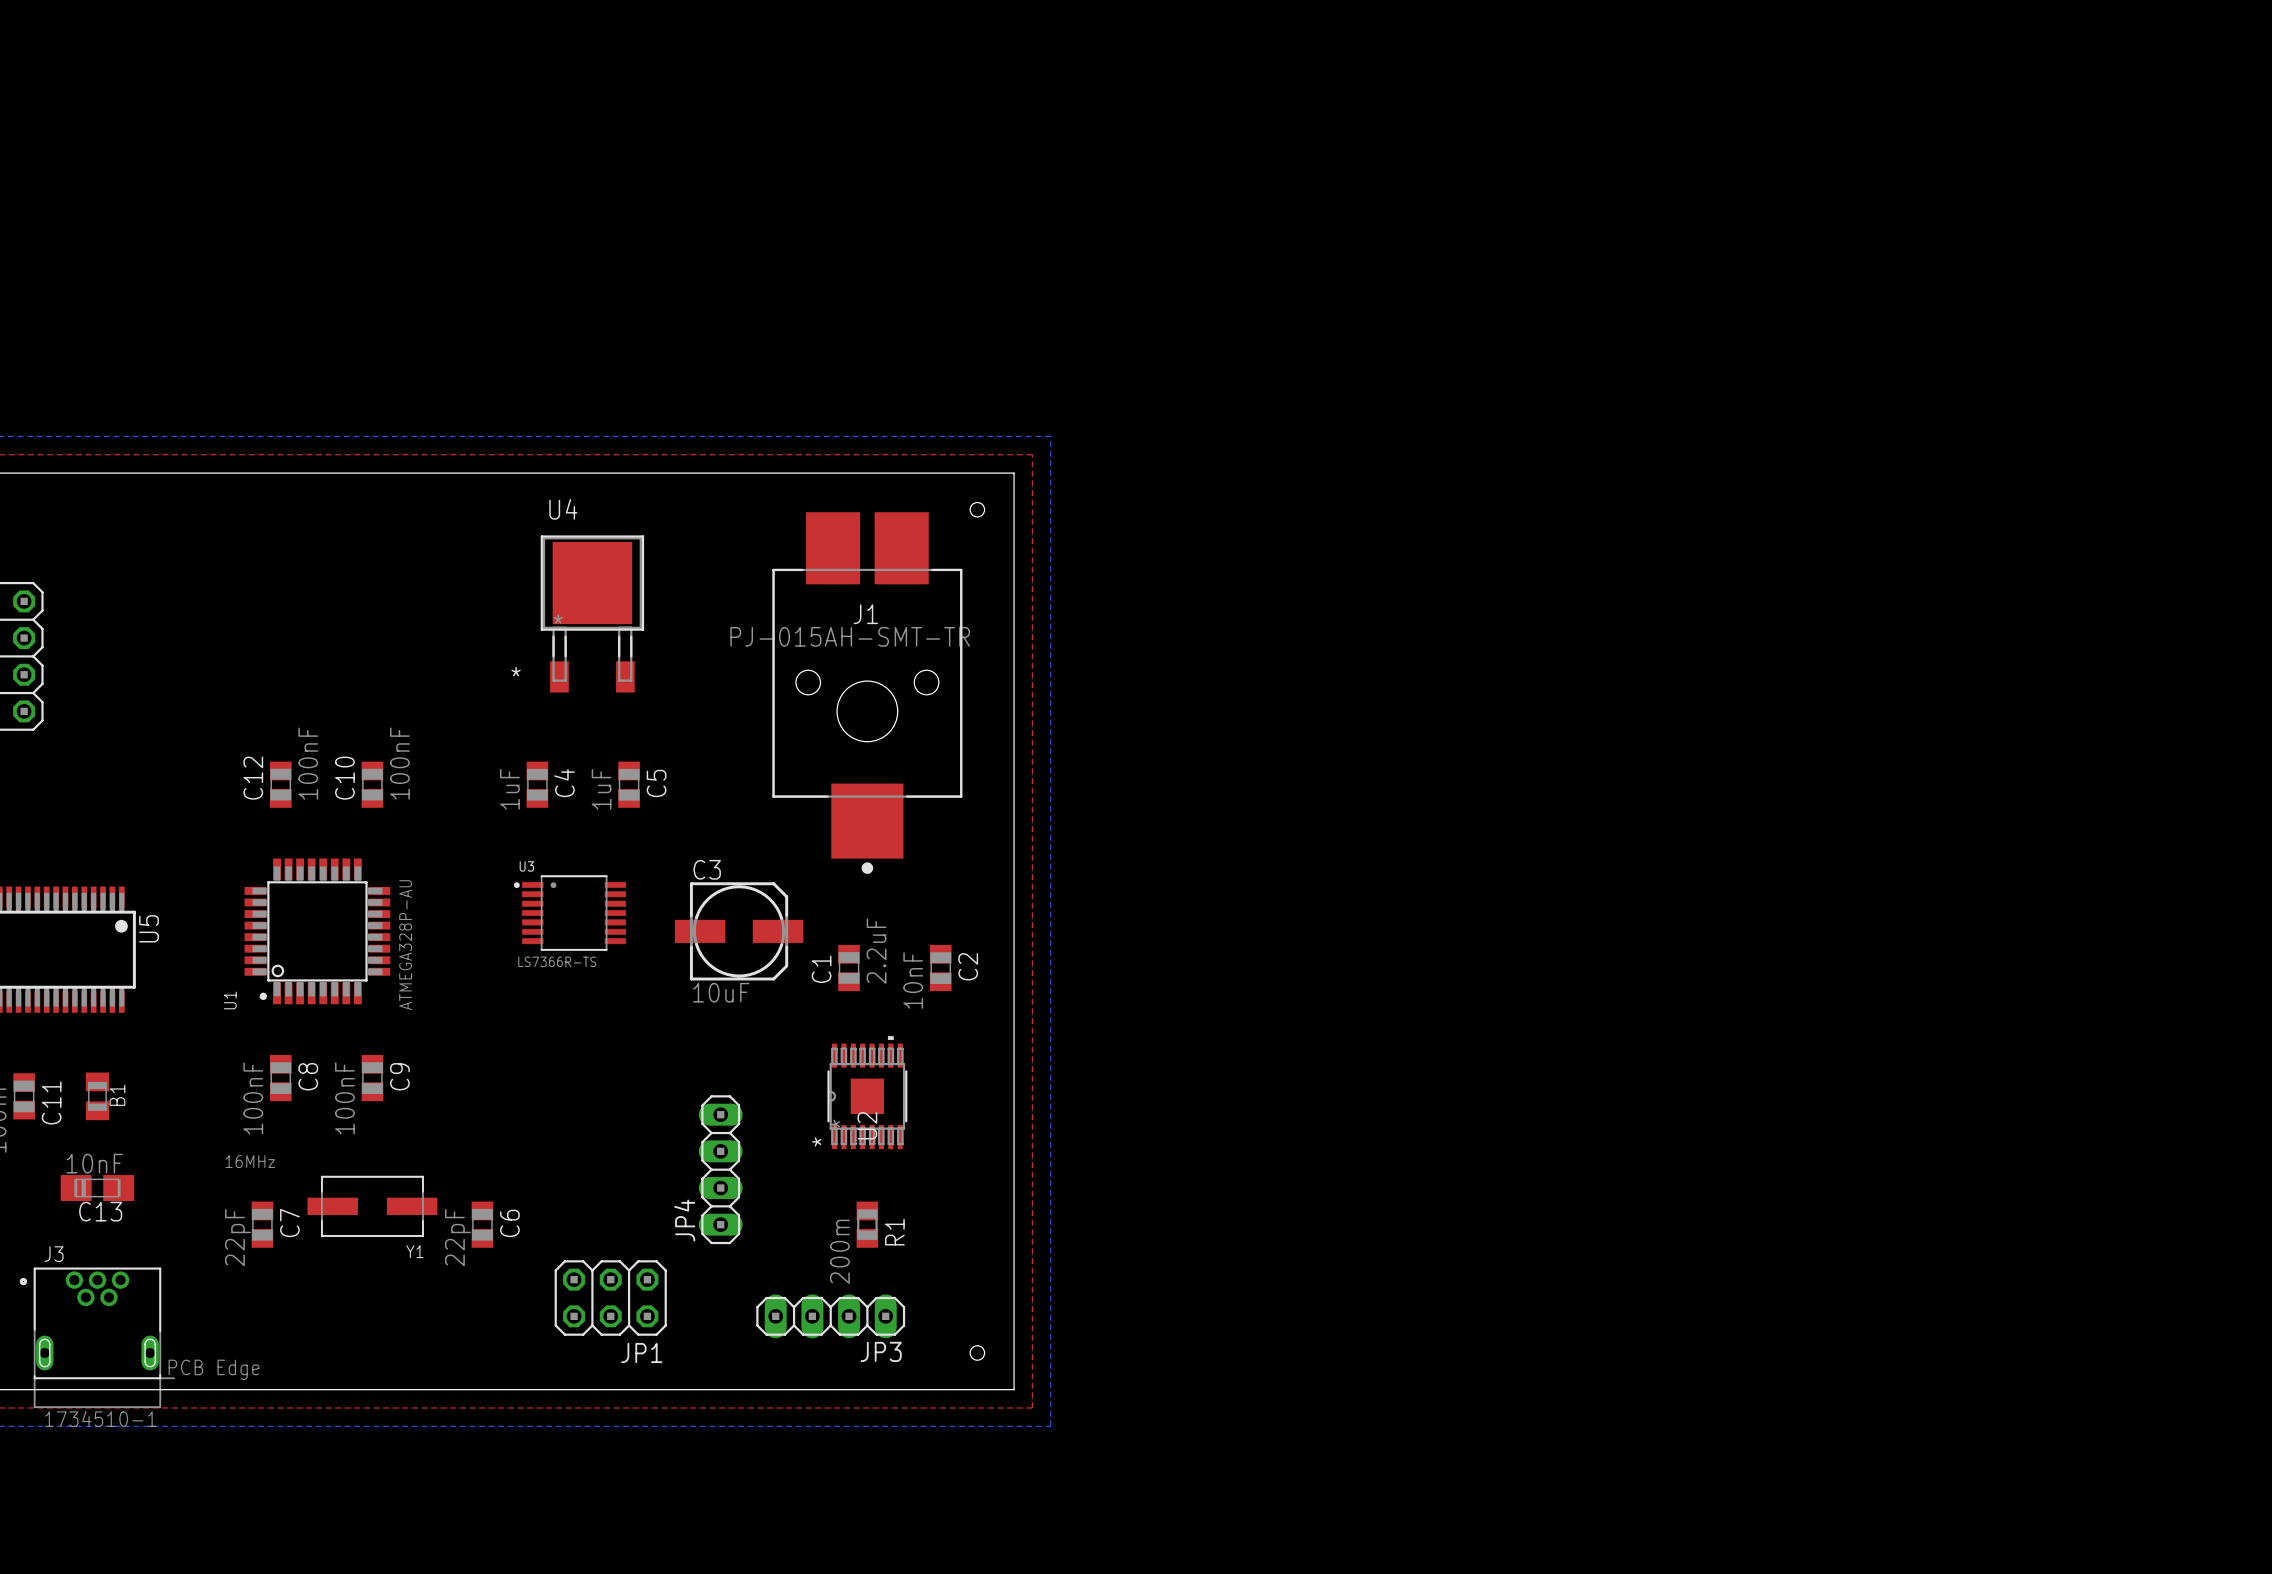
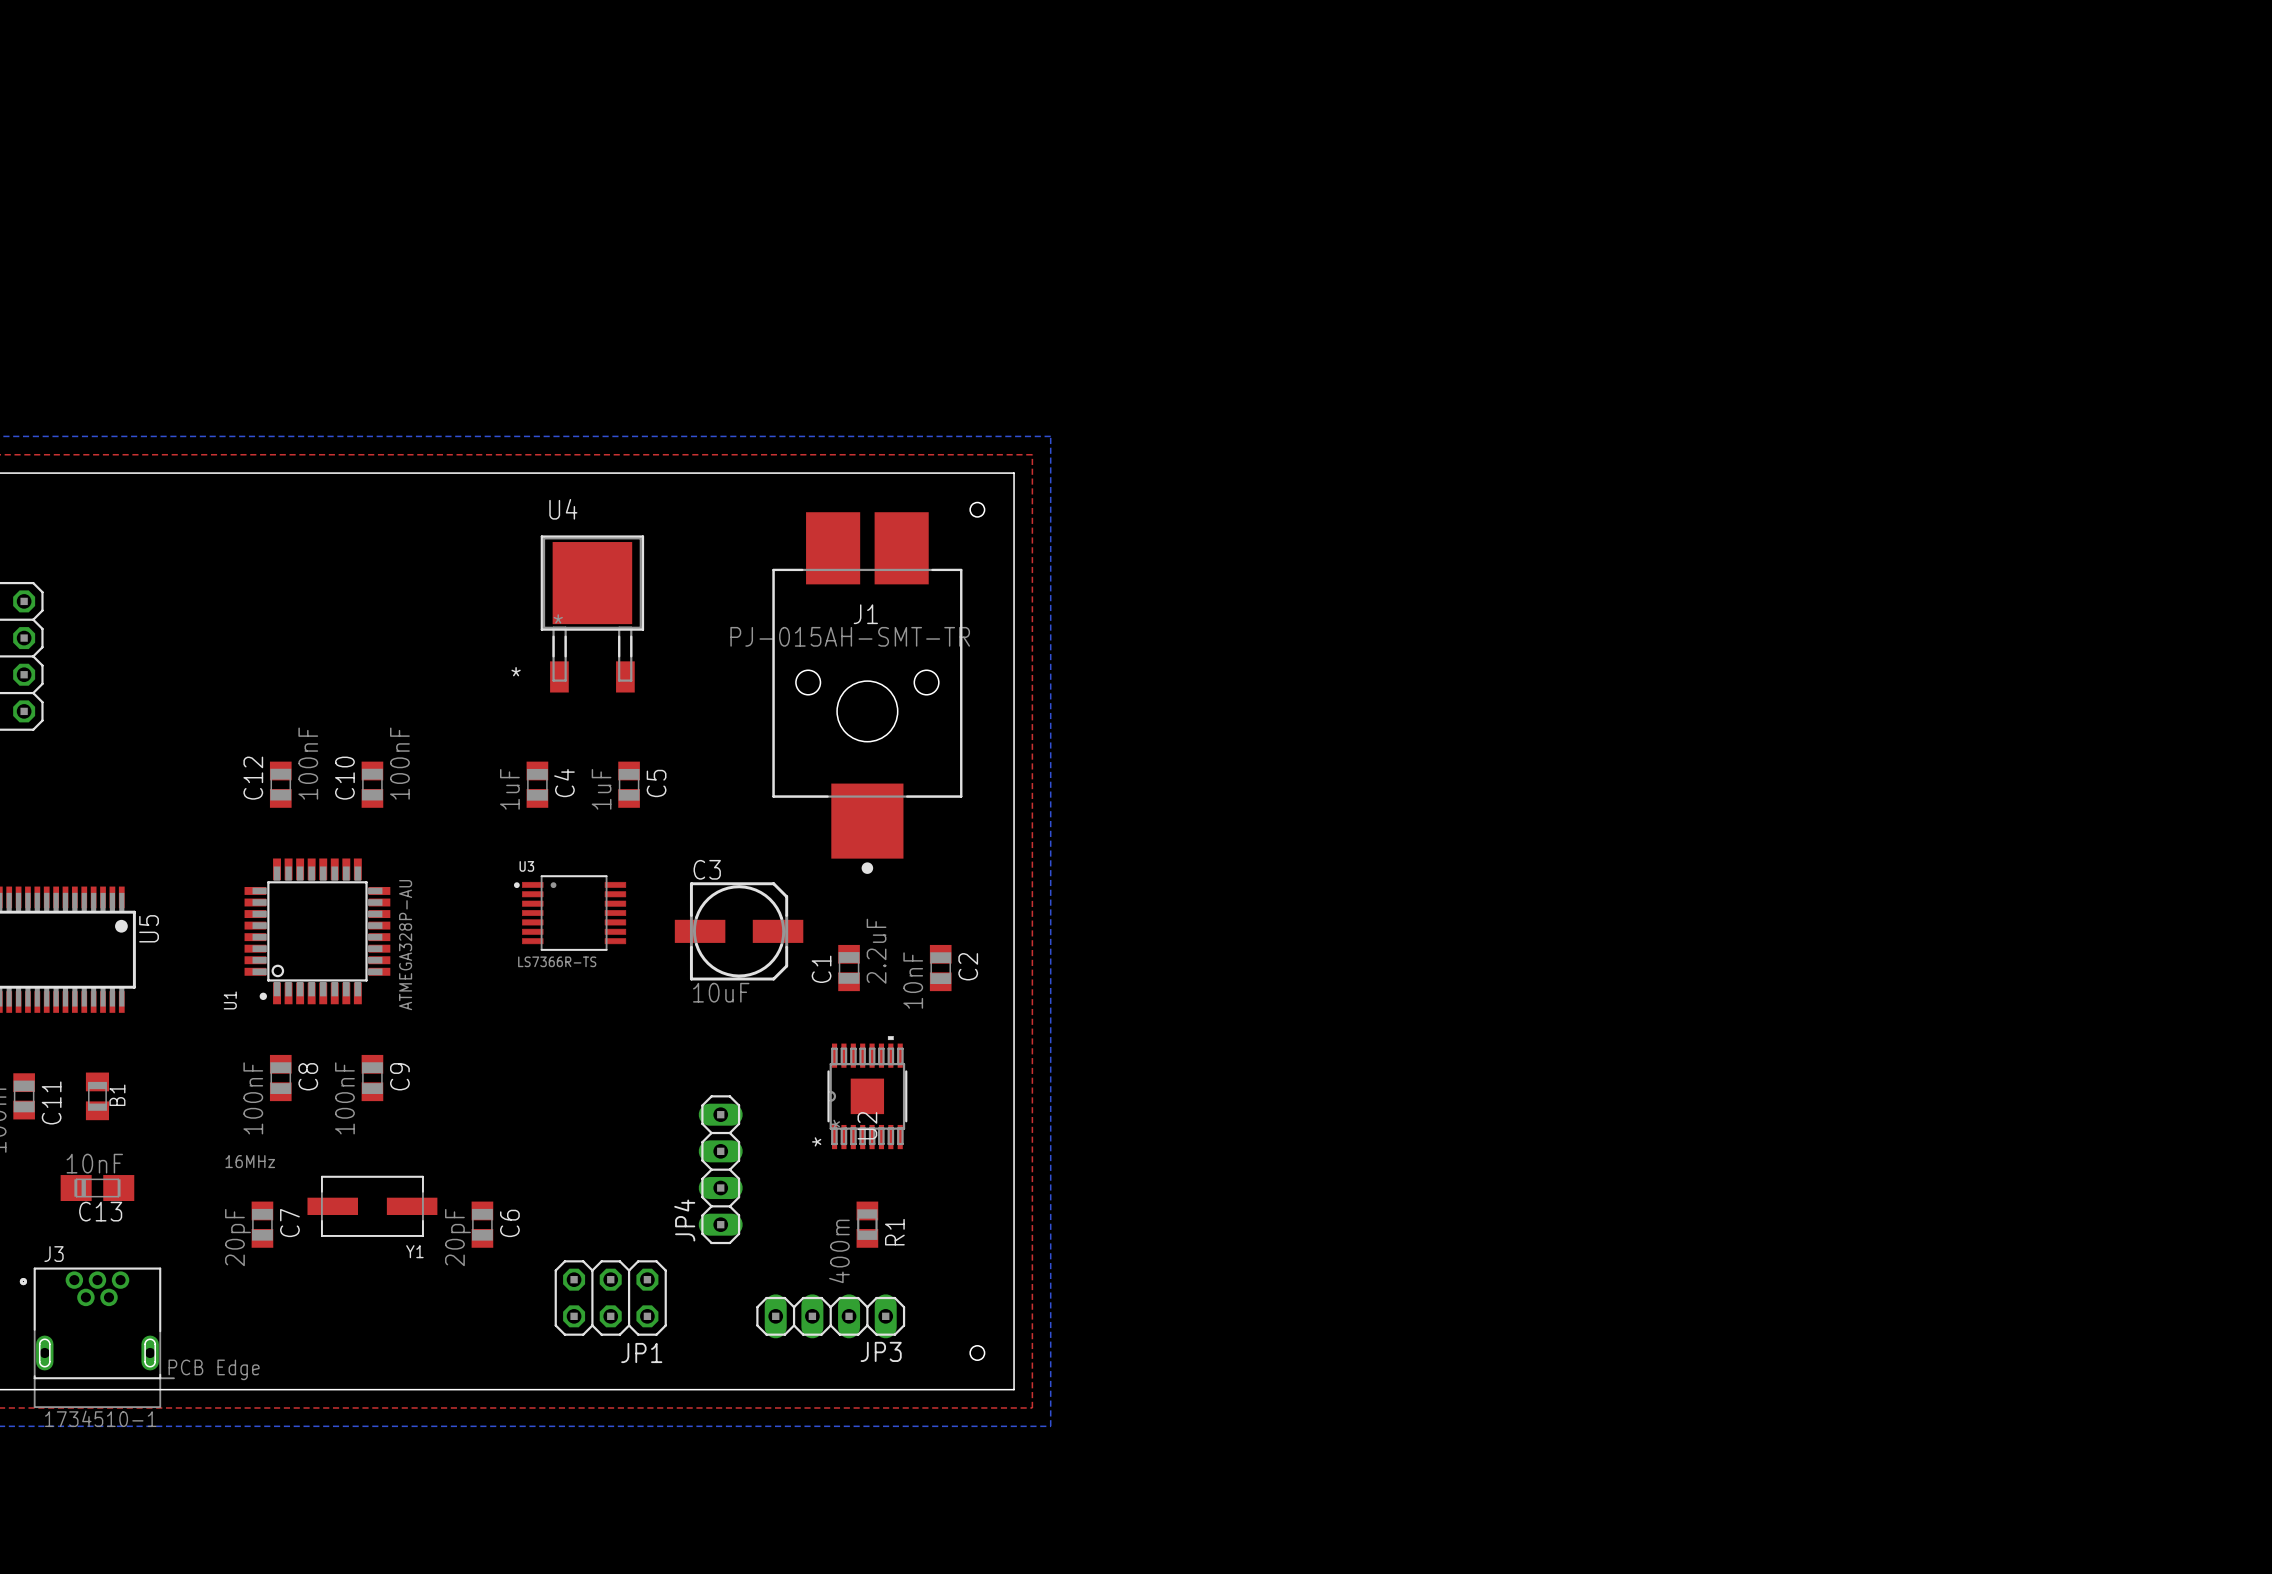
C7 value: 22pF (238, 1237) -> 20pF (238, 1237)
C6 value: 22pF (457, 1237) -> 20pF (457, 1237)
R1 value: 200m (839, 1251) -> 400m (839, 1251)

